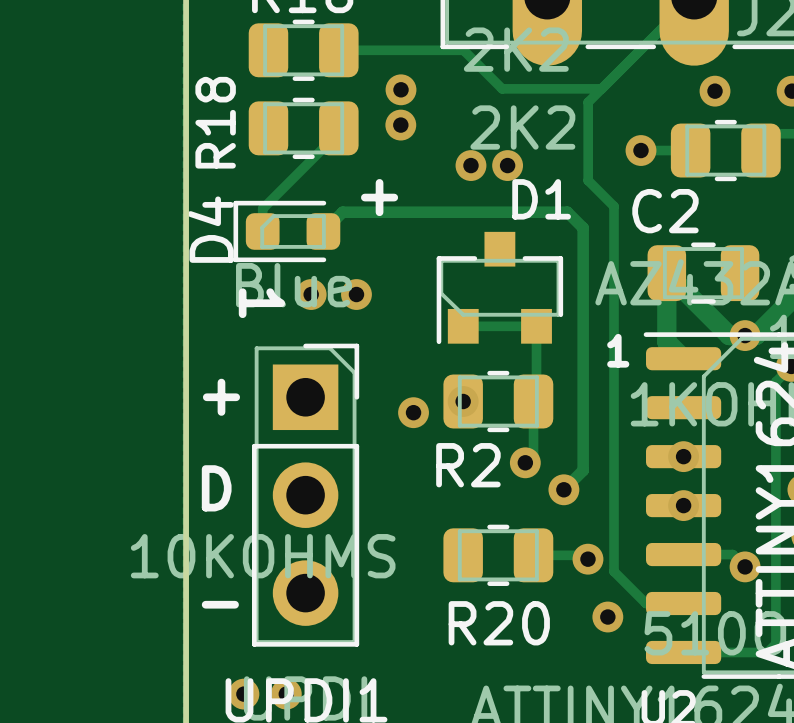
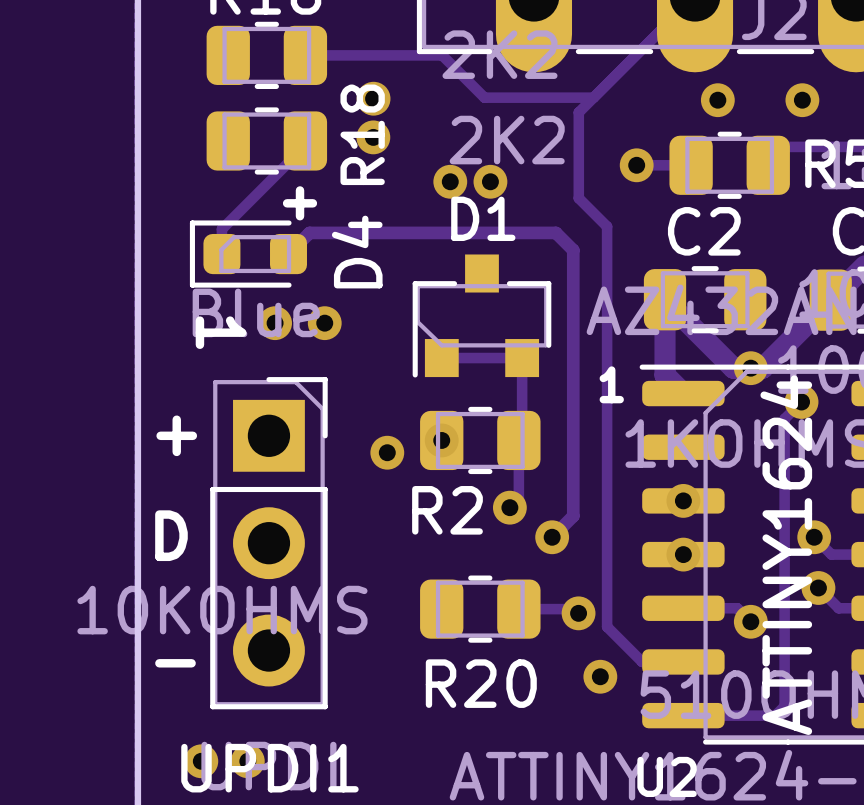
R18 name position: R18 (215, 122) -> R18 (362, 134)
text position: + (379, 197) -> + (300, 203)
D1 name position: D1 (541, 199) -> D1 (483, 218)
C2 name position: C2 (665, 211) -> C2 (704, 231)
D4 name position: D4 (210, 229) -> D4 (357, 252)

